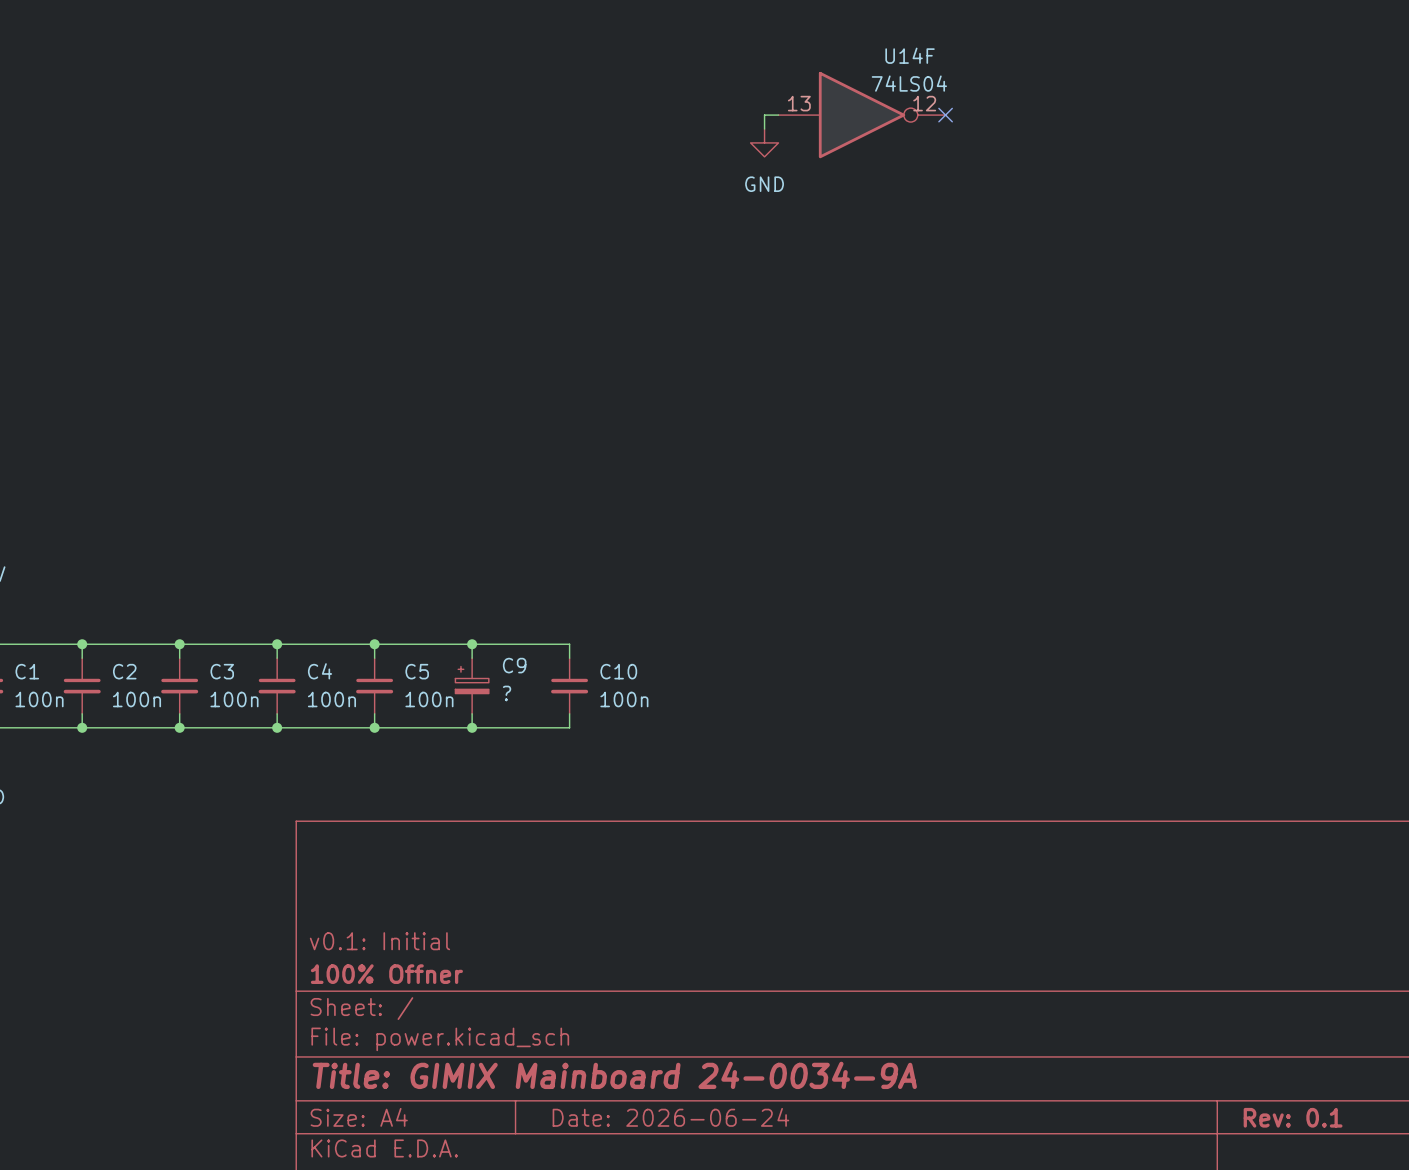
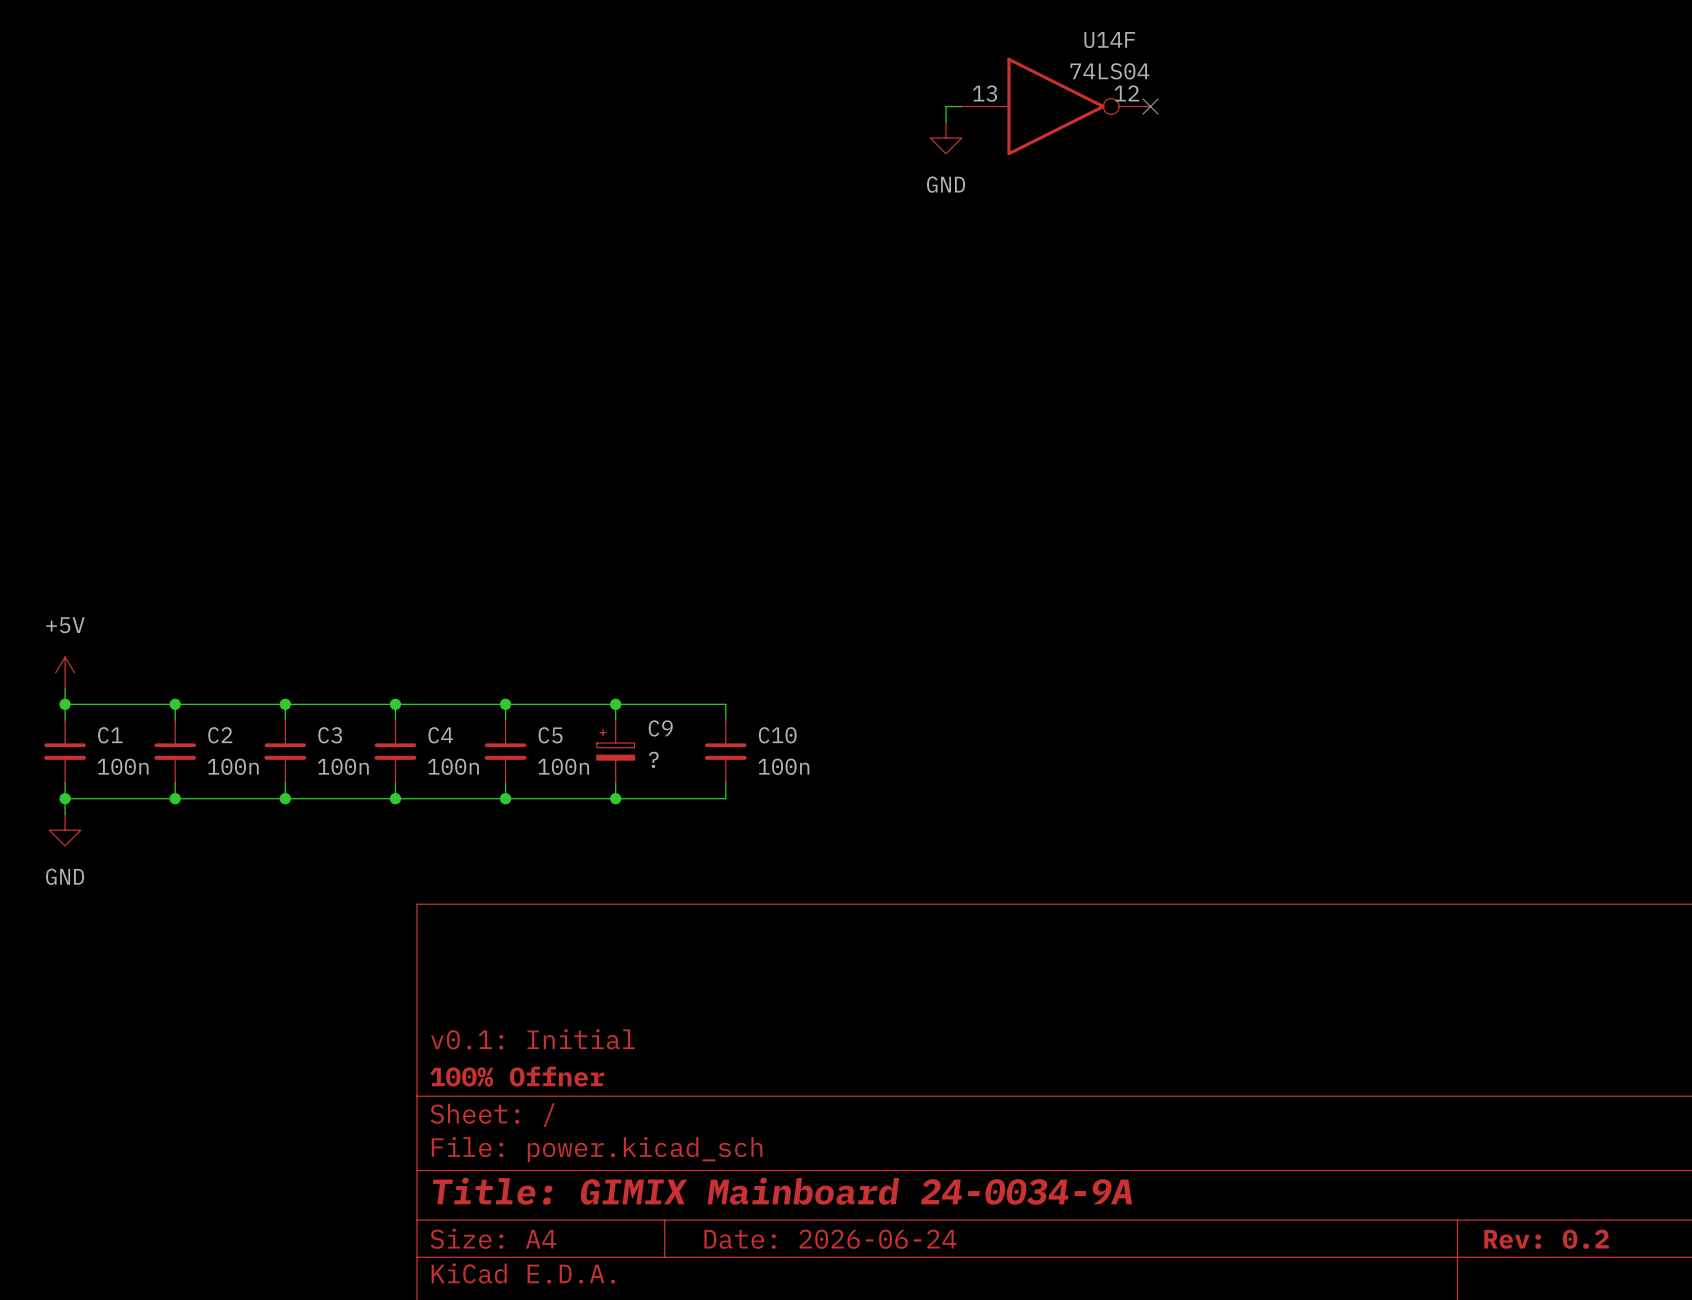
title block: Rev: 0.1 (1293, 1117) -> Rev: 0.2 (1546, 1239)

